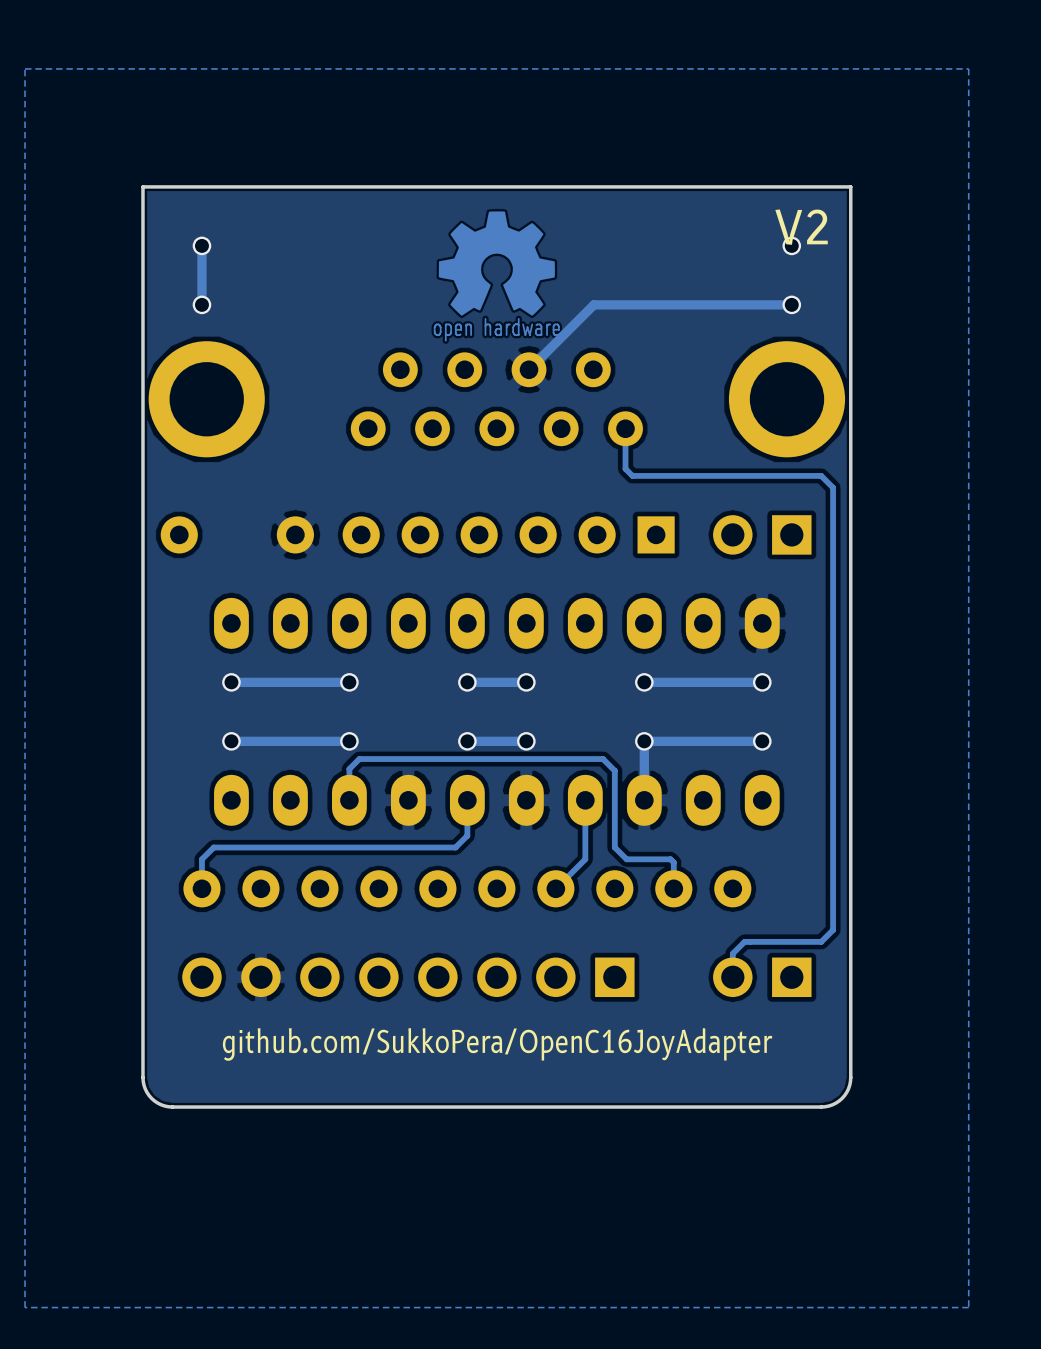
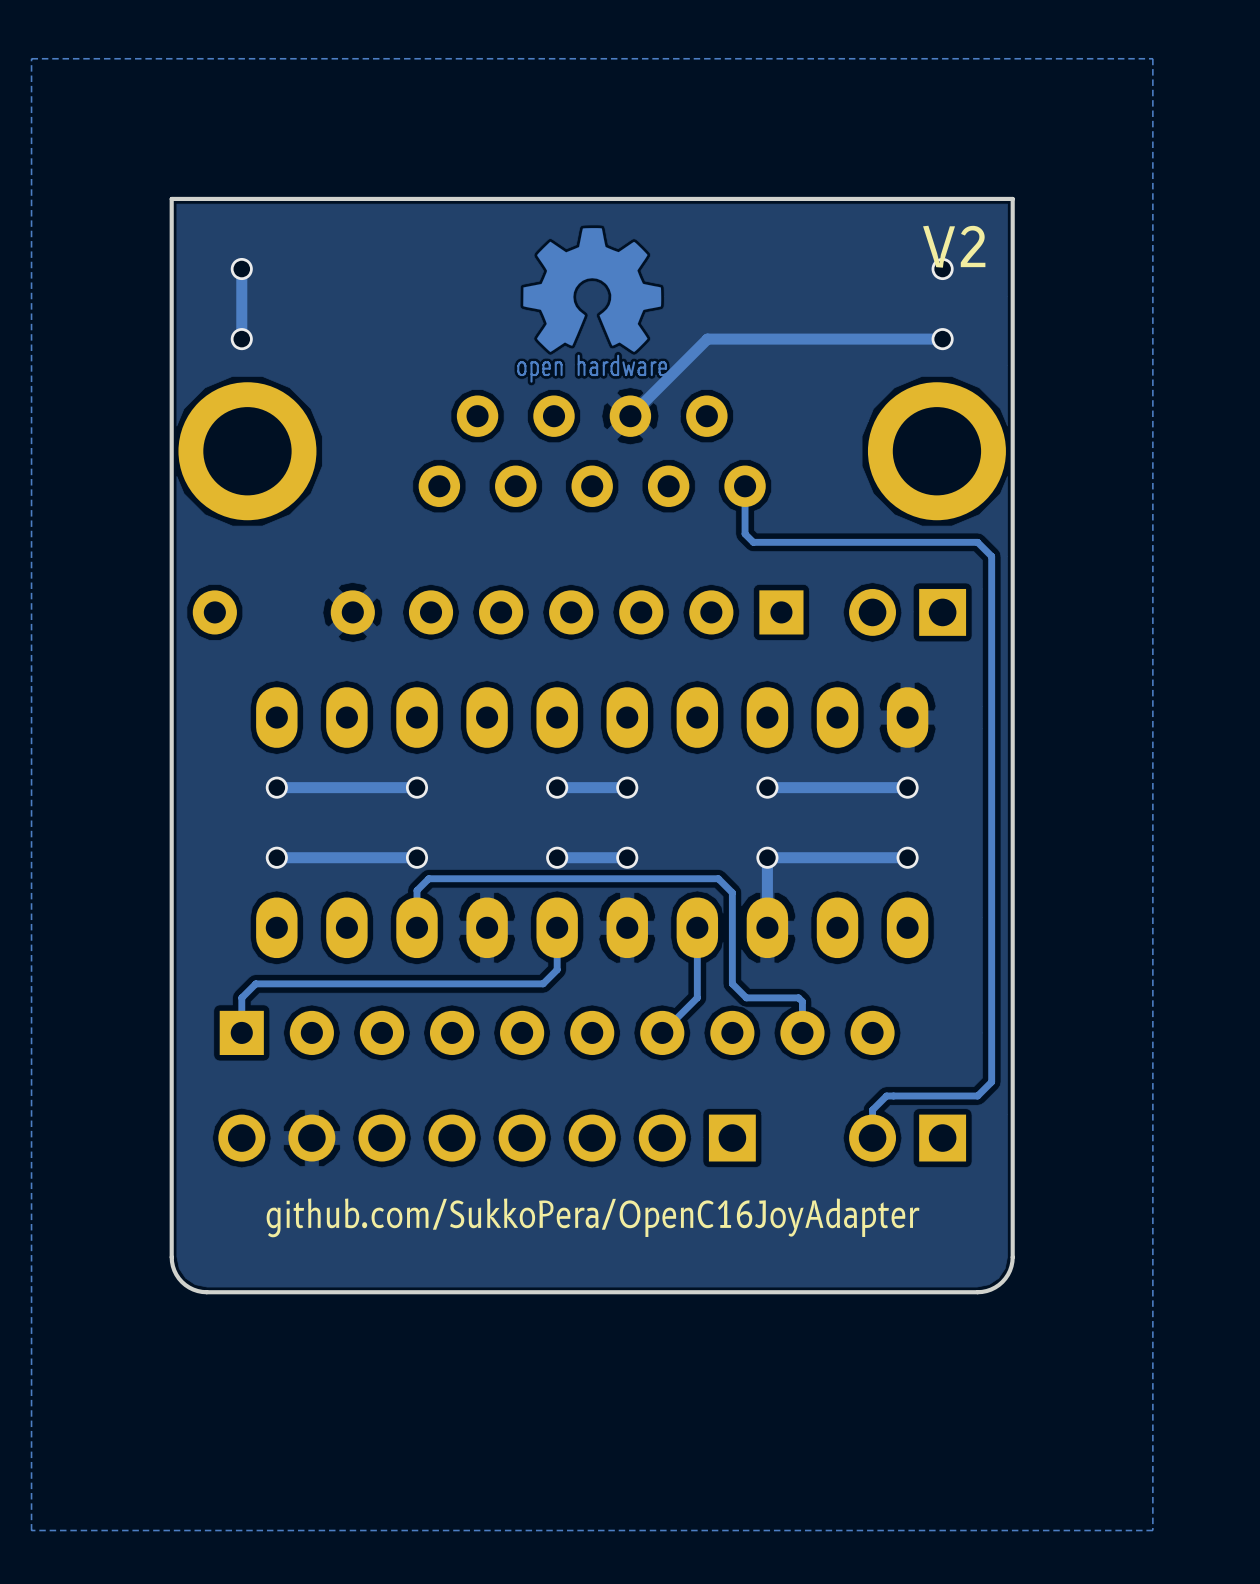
part footprint: [183, 870, 752, 908] -> [219, 1010, 895, 1056]

